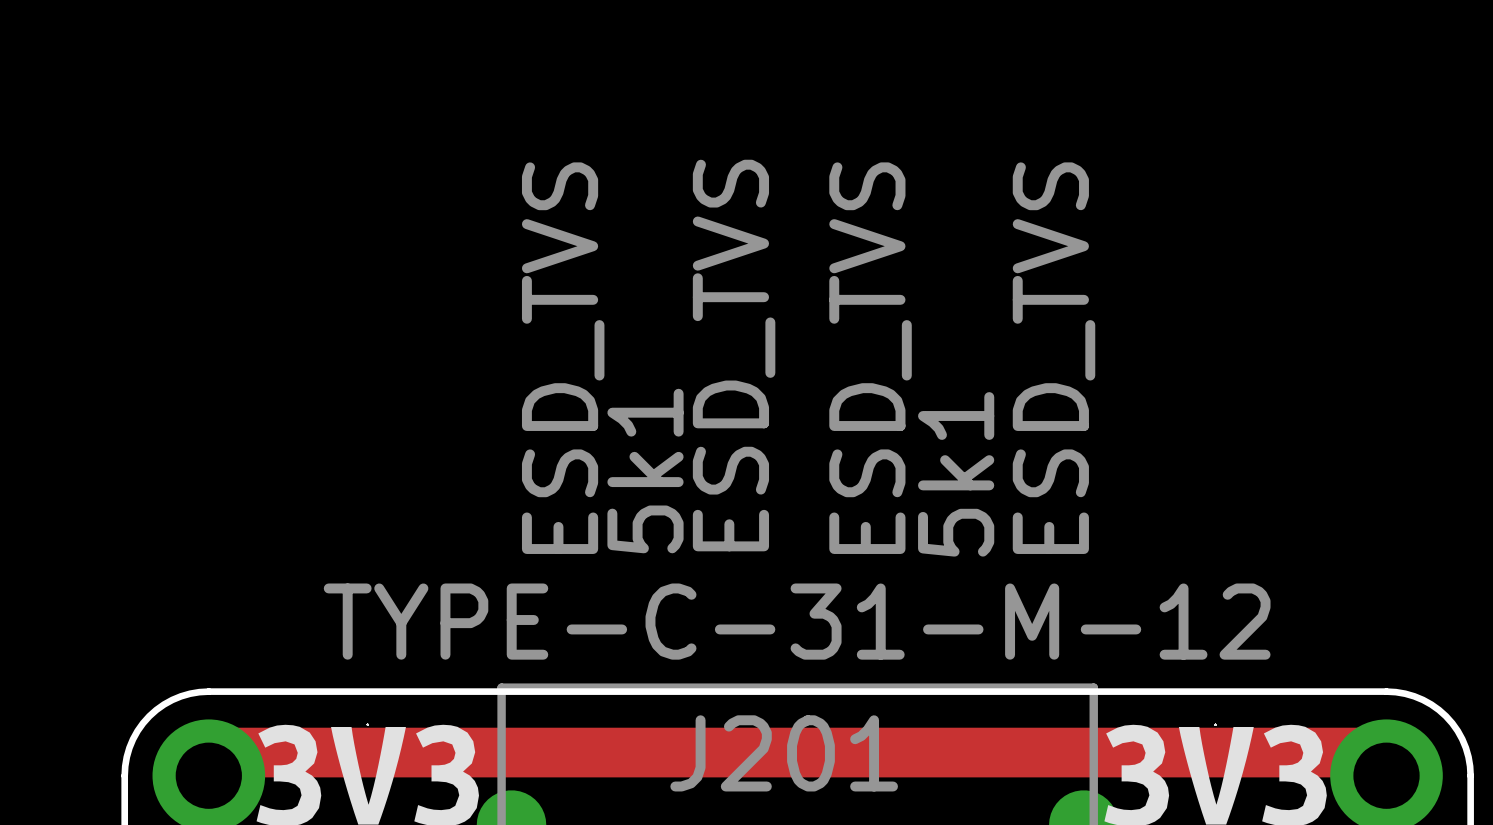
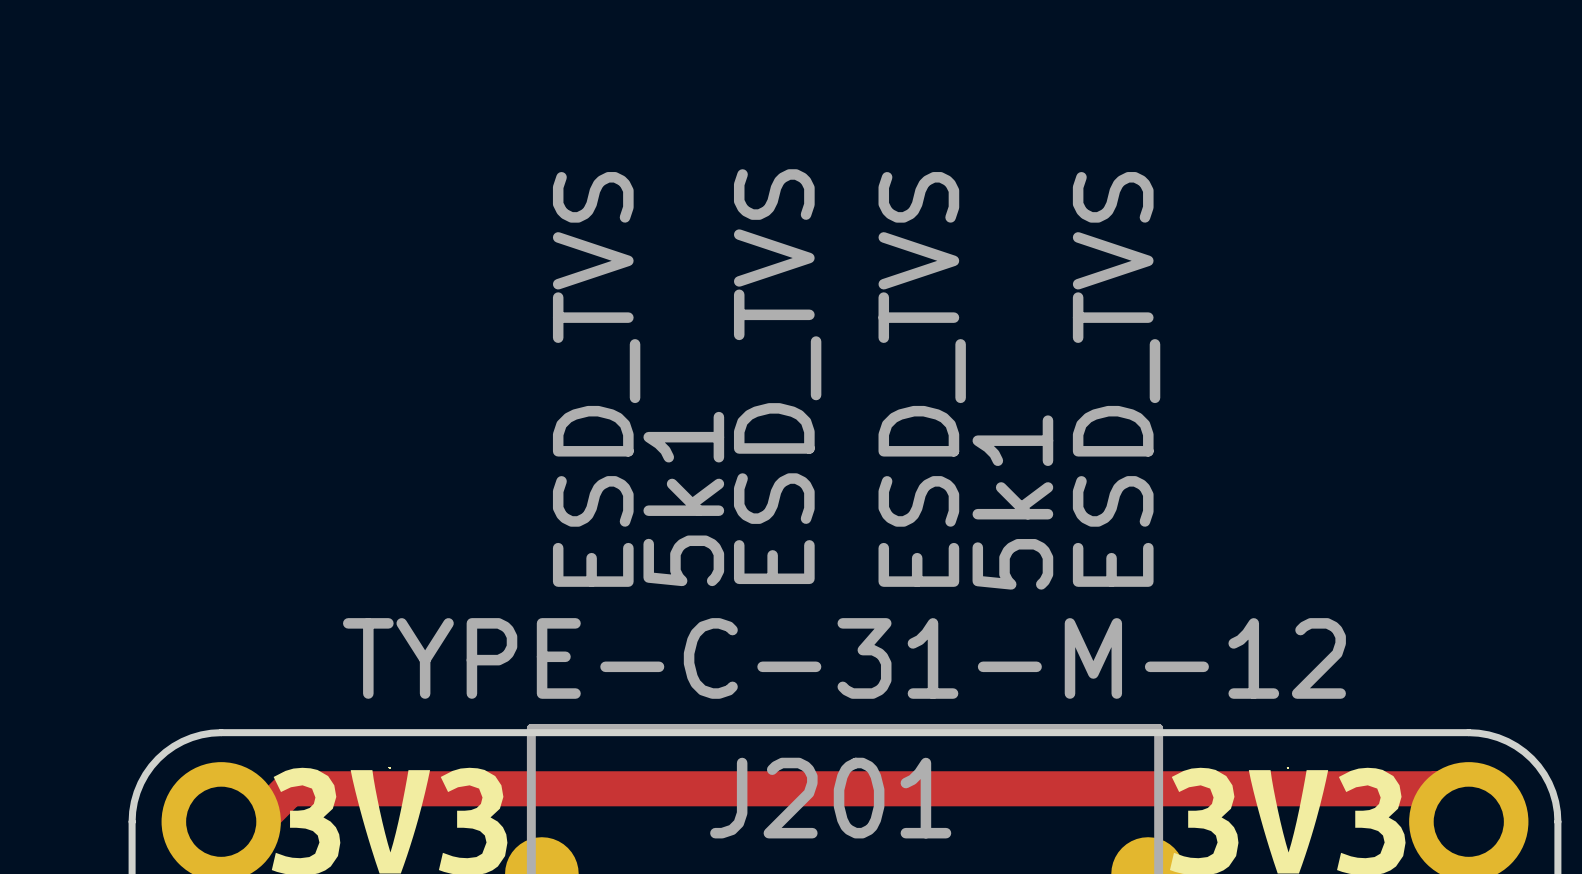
track: (1363, 752) (232, 752) (208, 775) -> (1444, 797) (1435, 788) (289, 788) (256, 821)

